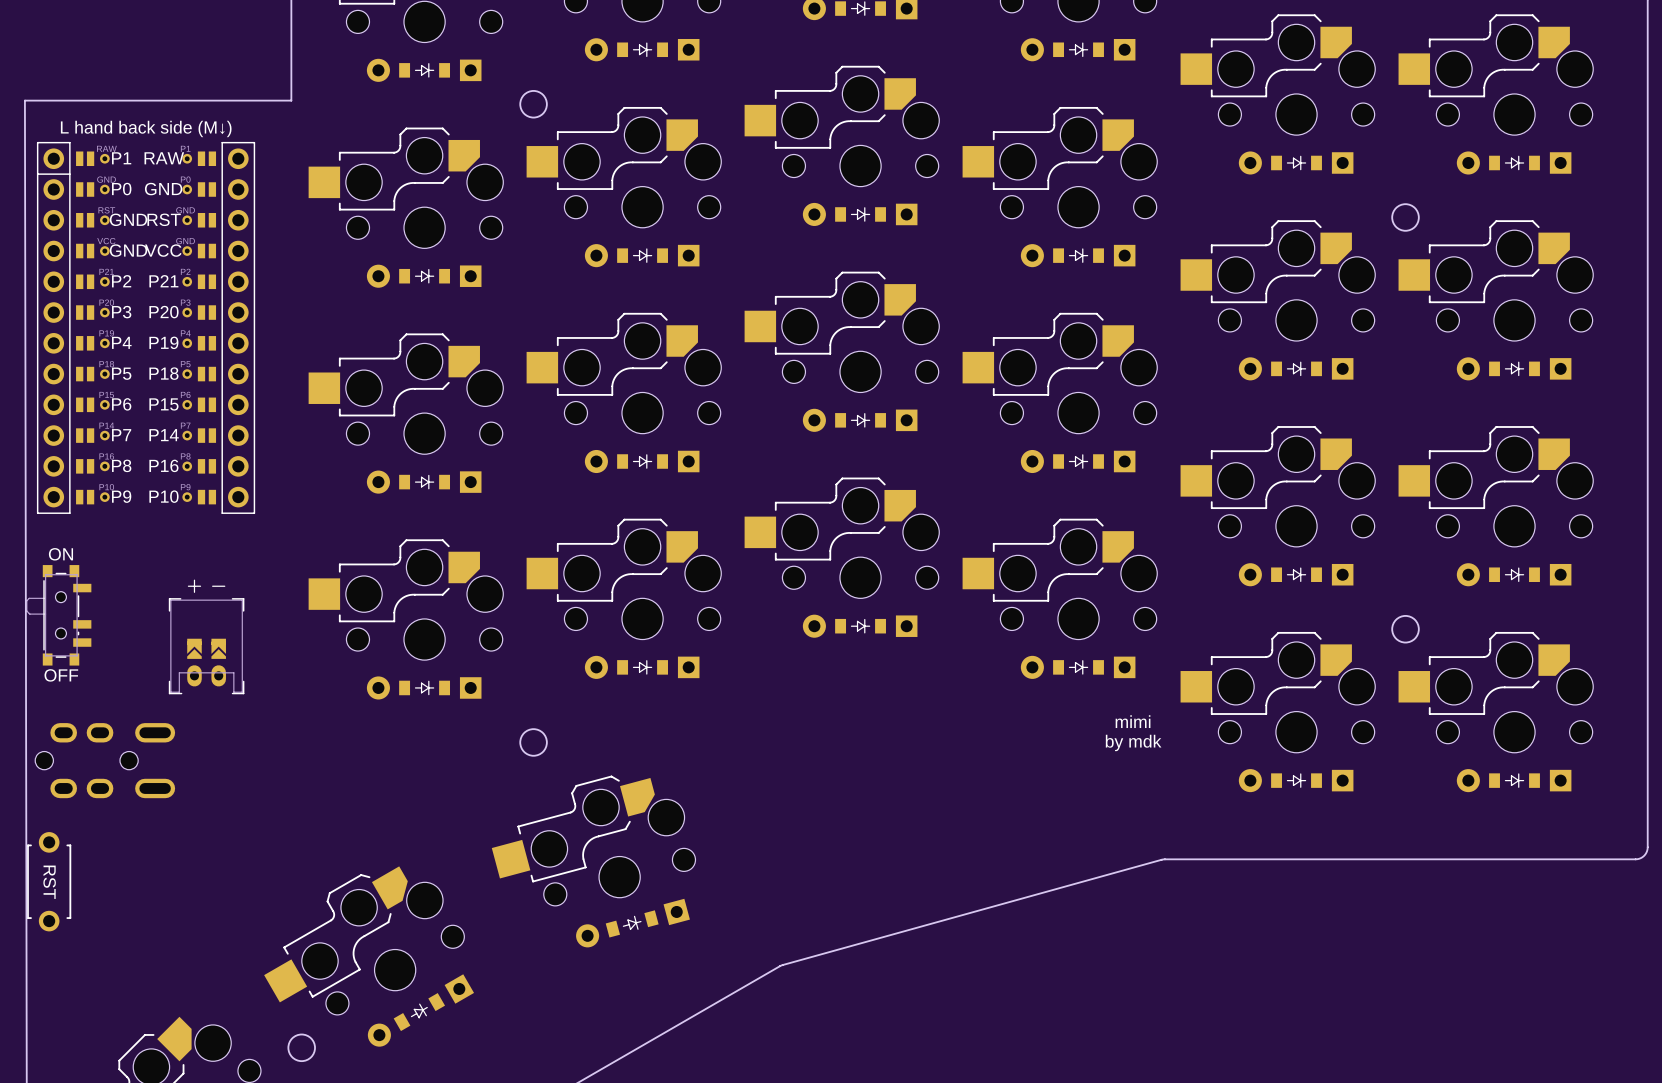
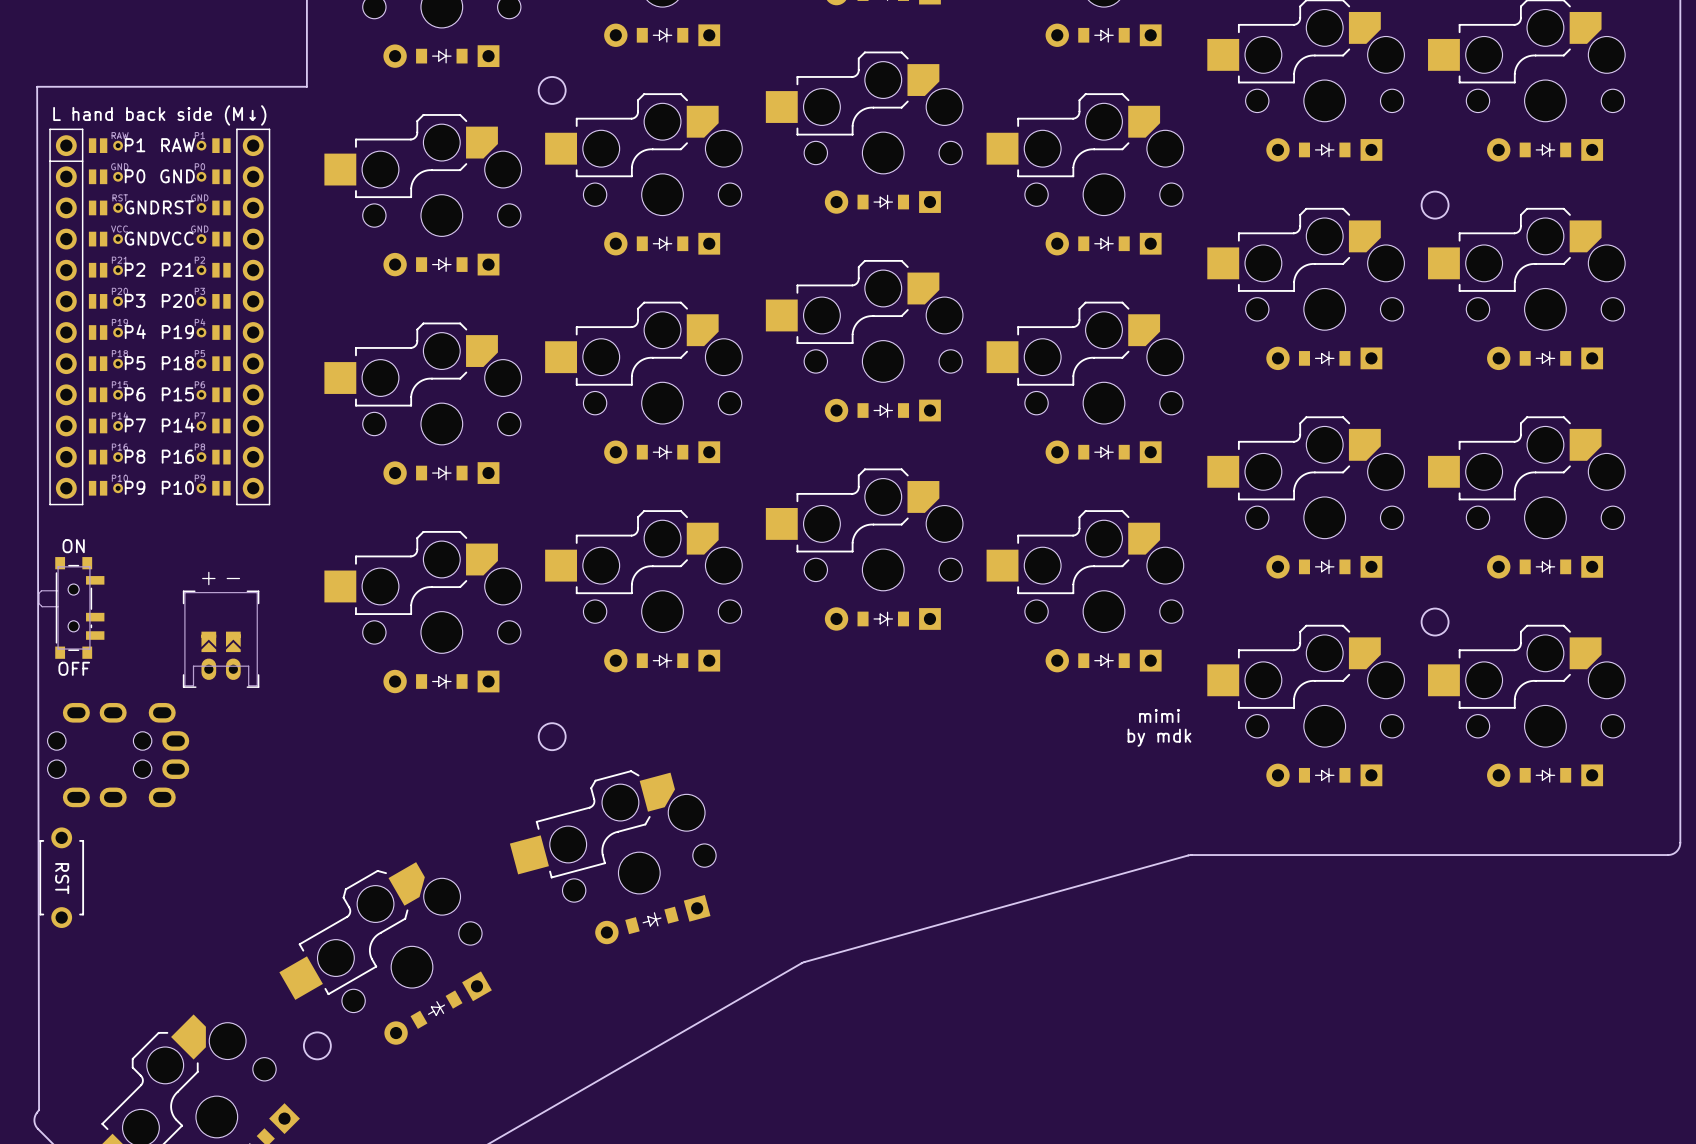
part footprint: [35, 723, 176, 799] -> [47, 702, 190, 808]

